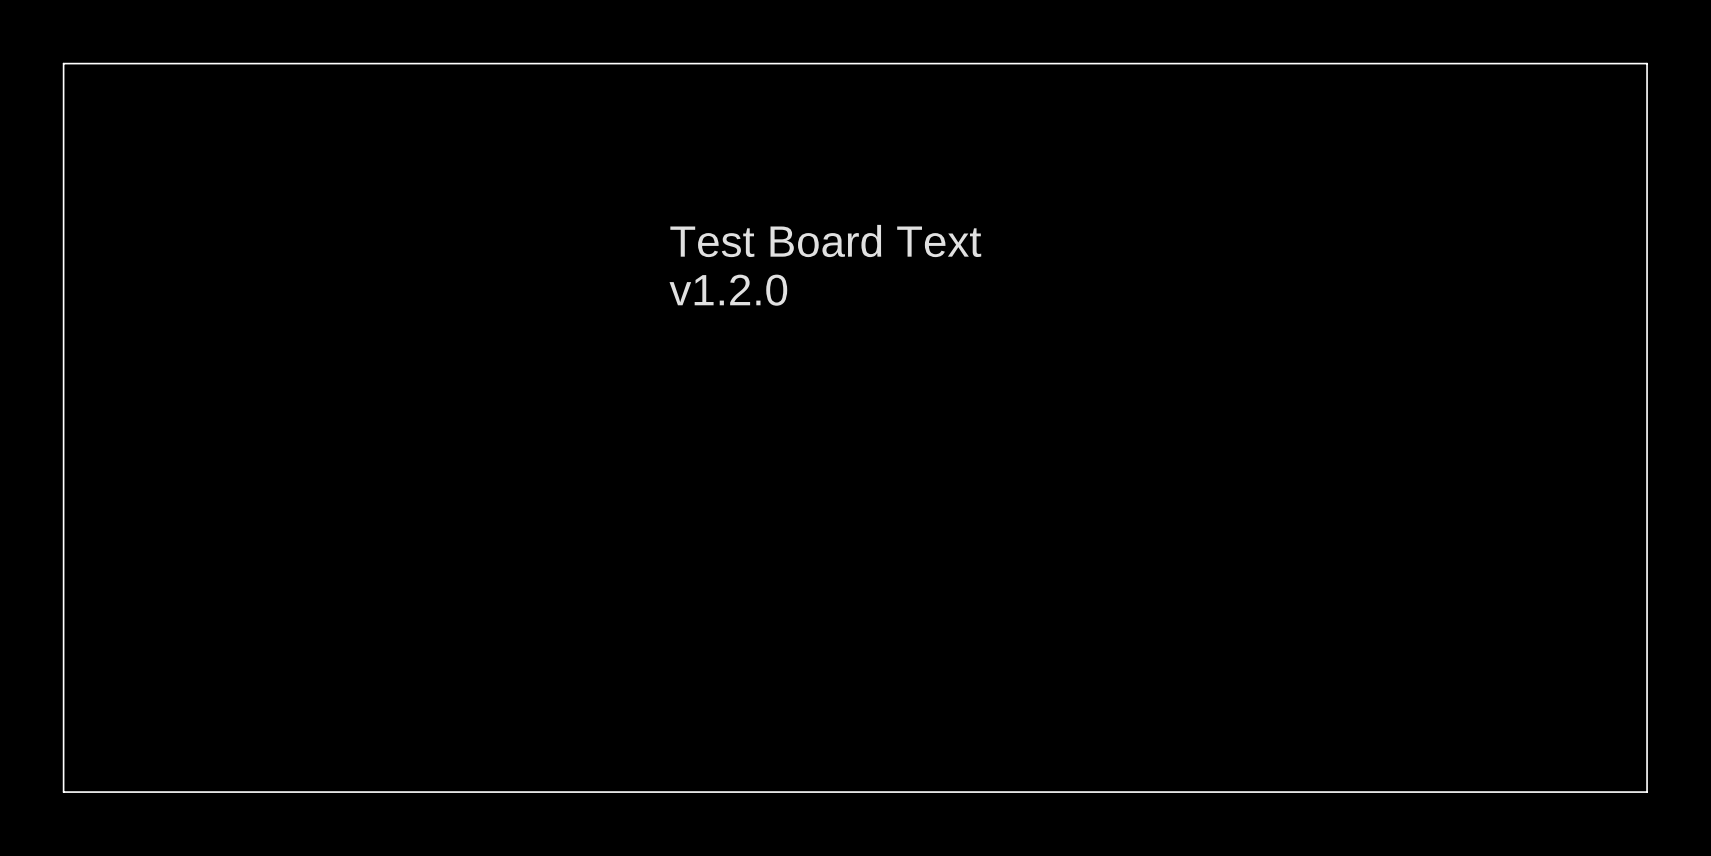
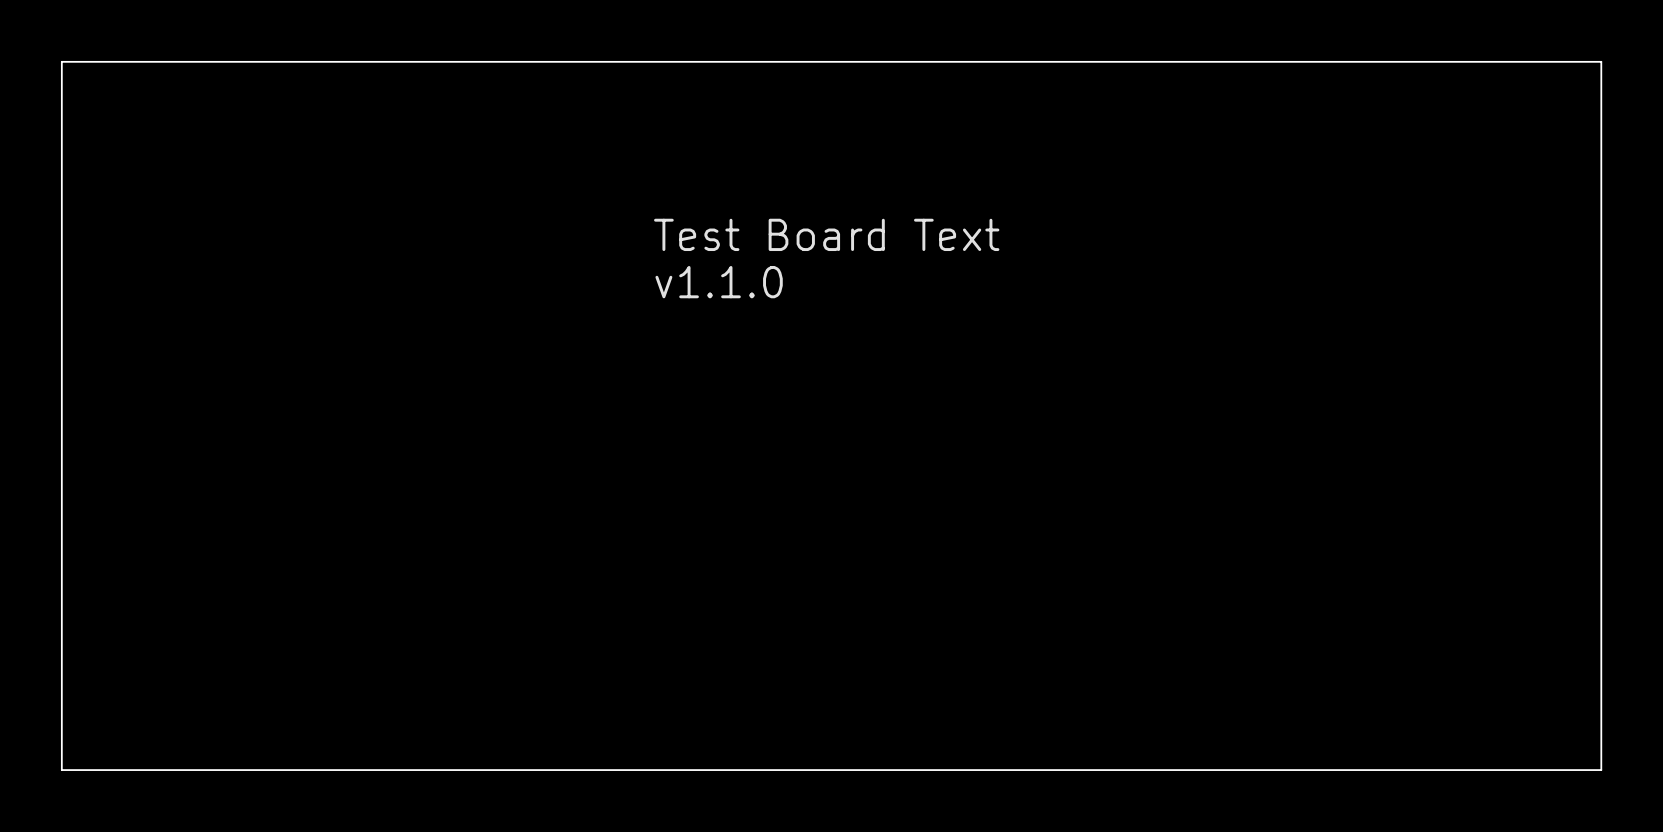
text: v1.2.0 (728, 290) -> v1.1.0 (719, 282)

